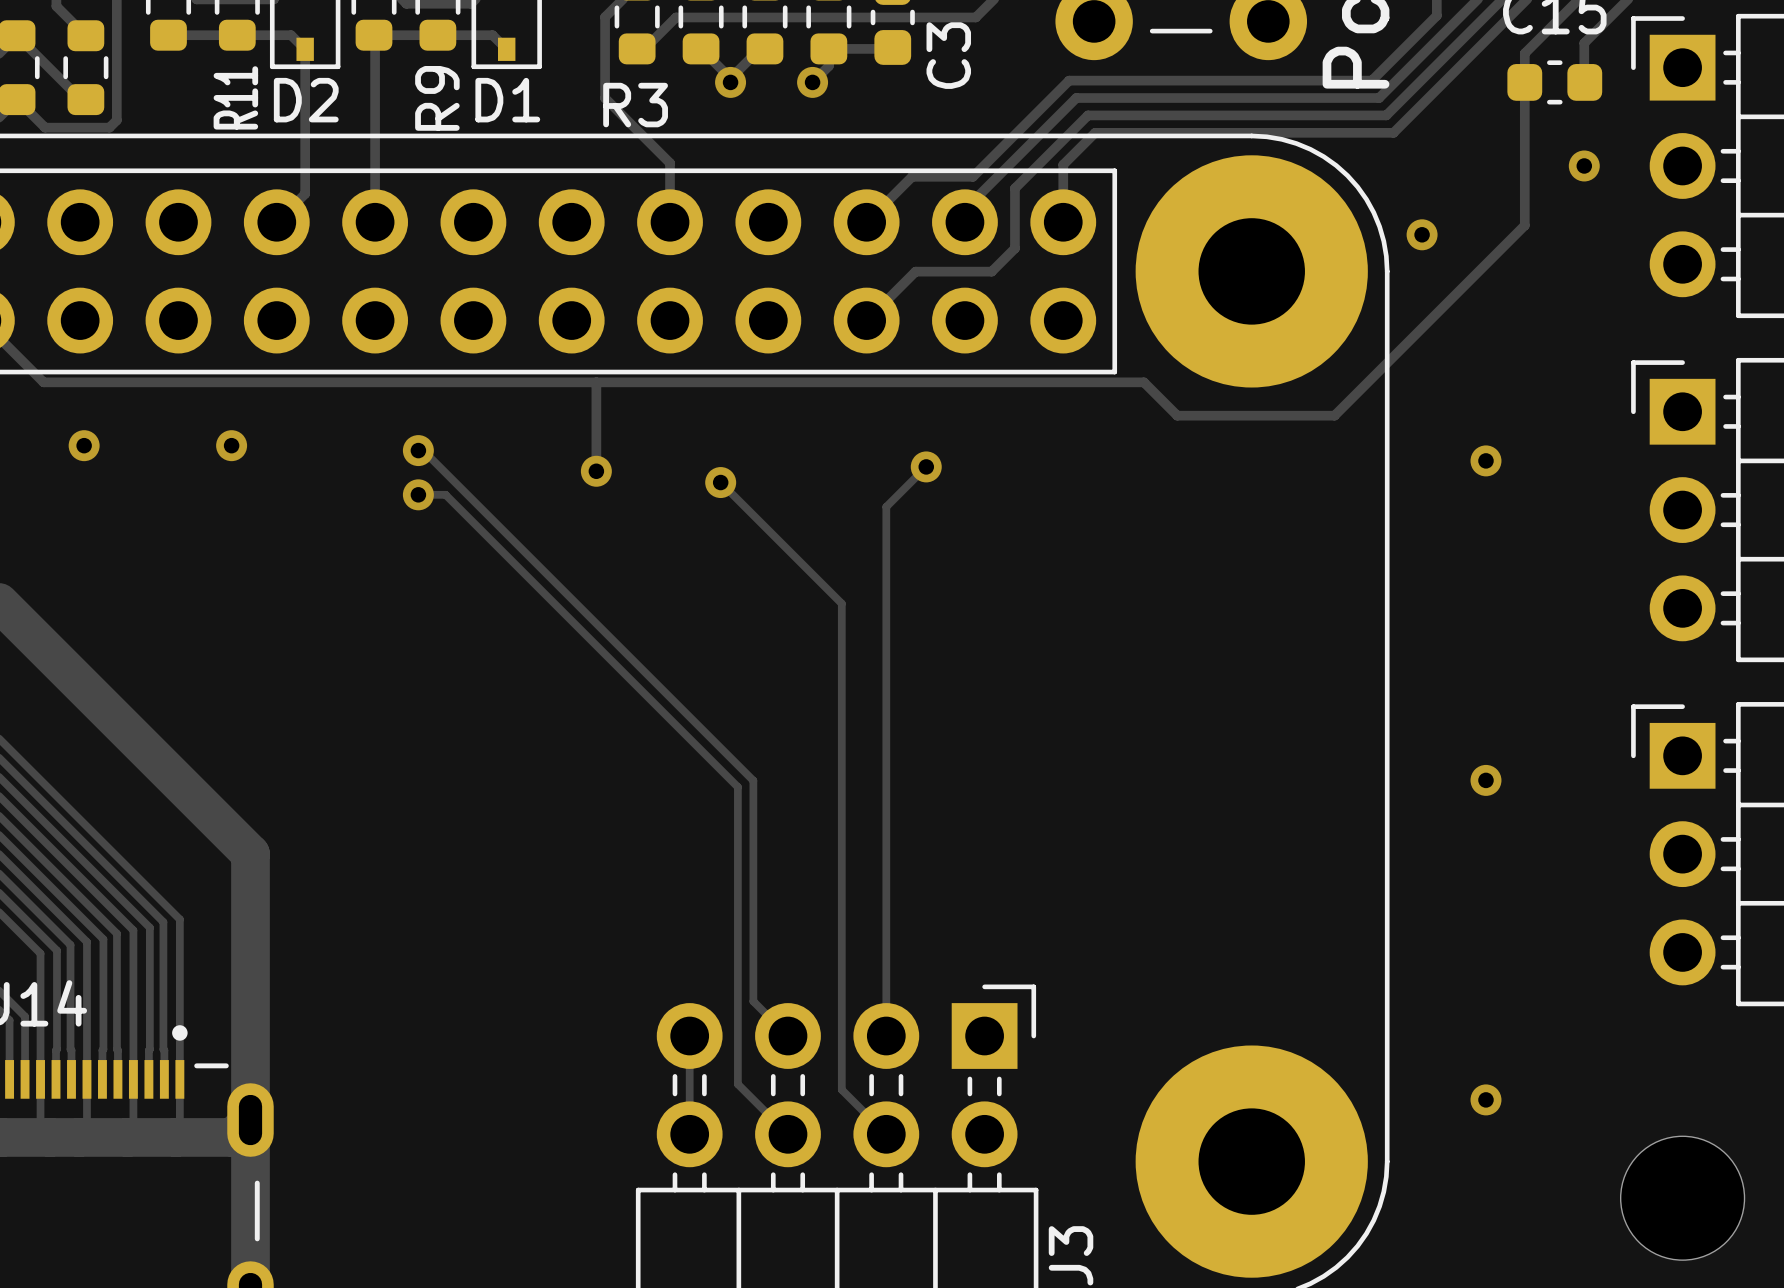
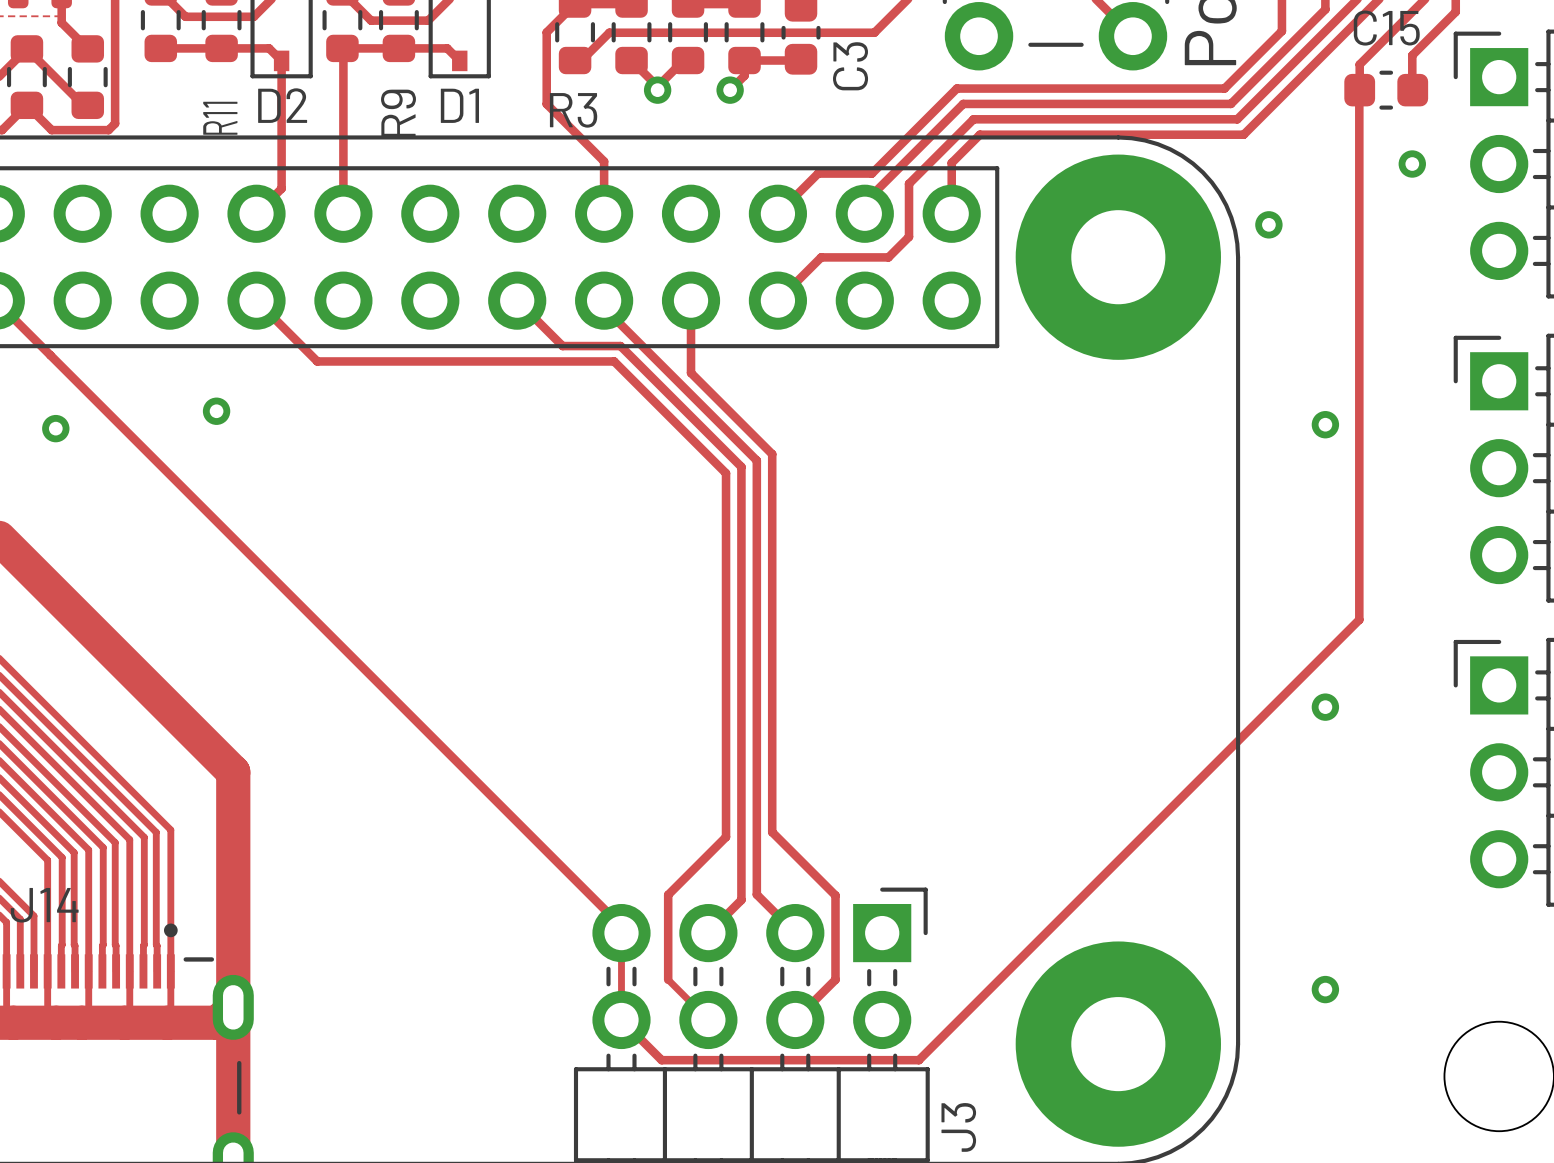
track: (1524, 82) (1524, 225) (1334, 415) (1177, 415) (1143, 382) (43, 382) -> (1359, 90) (1359, 619) (918, 1060) (661, 1060) (621, 1019)
track: none -> (50, 355) (621, 926) (621, 933)
track: (596, 382) (596, 471) -> none
via position: (84, 445) -> (55, 428)
track: (418, 450) (423, 450) (753, 780) (753, 1001) (787, 1036) -> (517, 300) (562, 346) (620, 346) (741, 466) (741, 900) (708, 933)
via: (418, 450) -> none
track: (926, 466) (886, 506) (886, 1036) -> (604, 300) (604, 307) (756, 460) (756, 894) (795, 933)
via: (926, 466) -> none
via: (596, 471) -> none
track: (720, 482) (841, 603) (841, 1089) (886, 1134) -> (691, 300) (691, 372) (772, 454) (772, 832) (835, 895) (835, 979) (795, 1019)
via: (720, 482) -> none
track: (418, 494) (445, 494) (737, 787) (737, 1084) (742, 1088) -> (256, 300) (317, 361) (614, 361) (726, 473) (726, 837) (668, 894) (668, 979)
via: (418, 494) -> none

